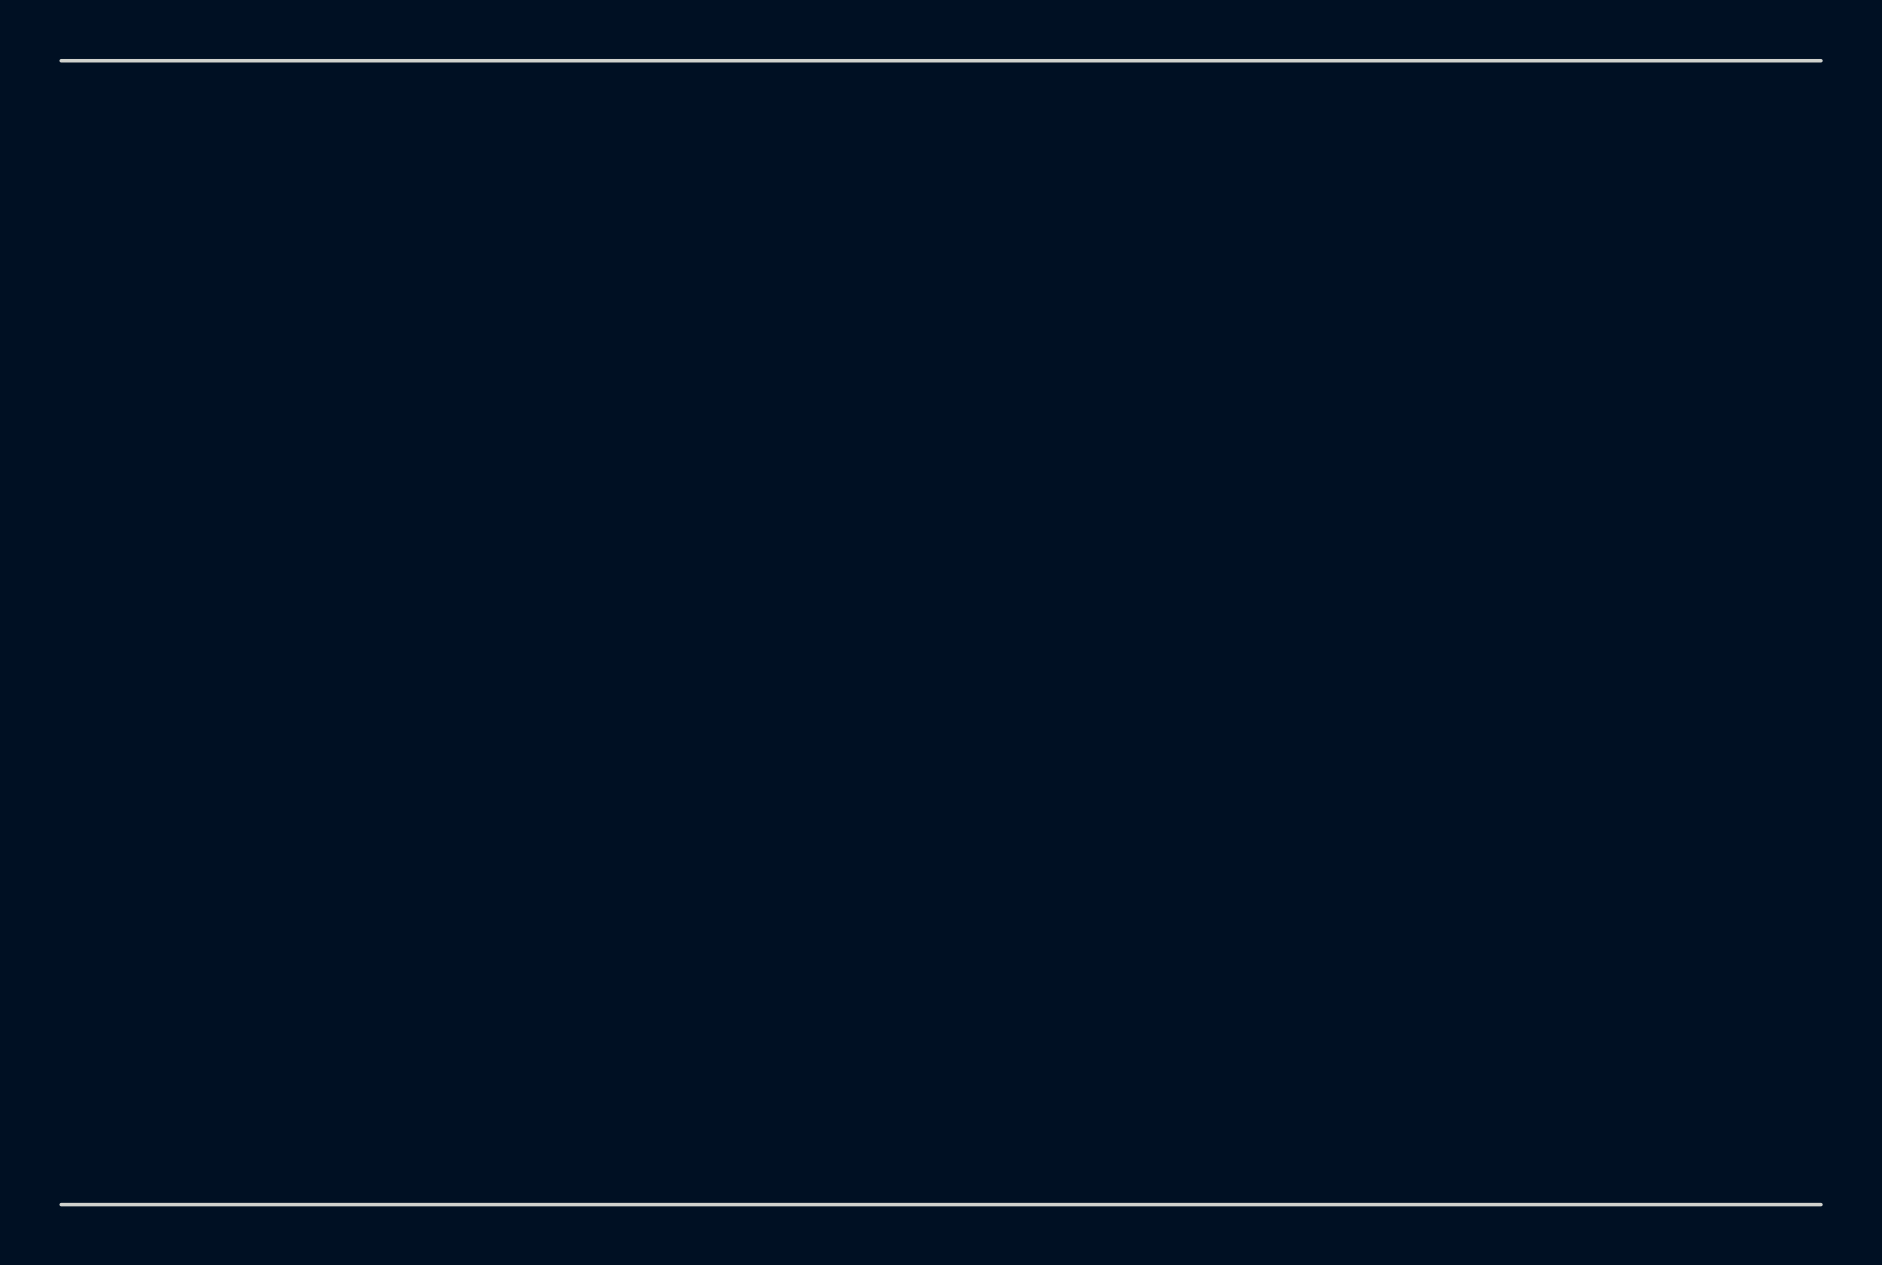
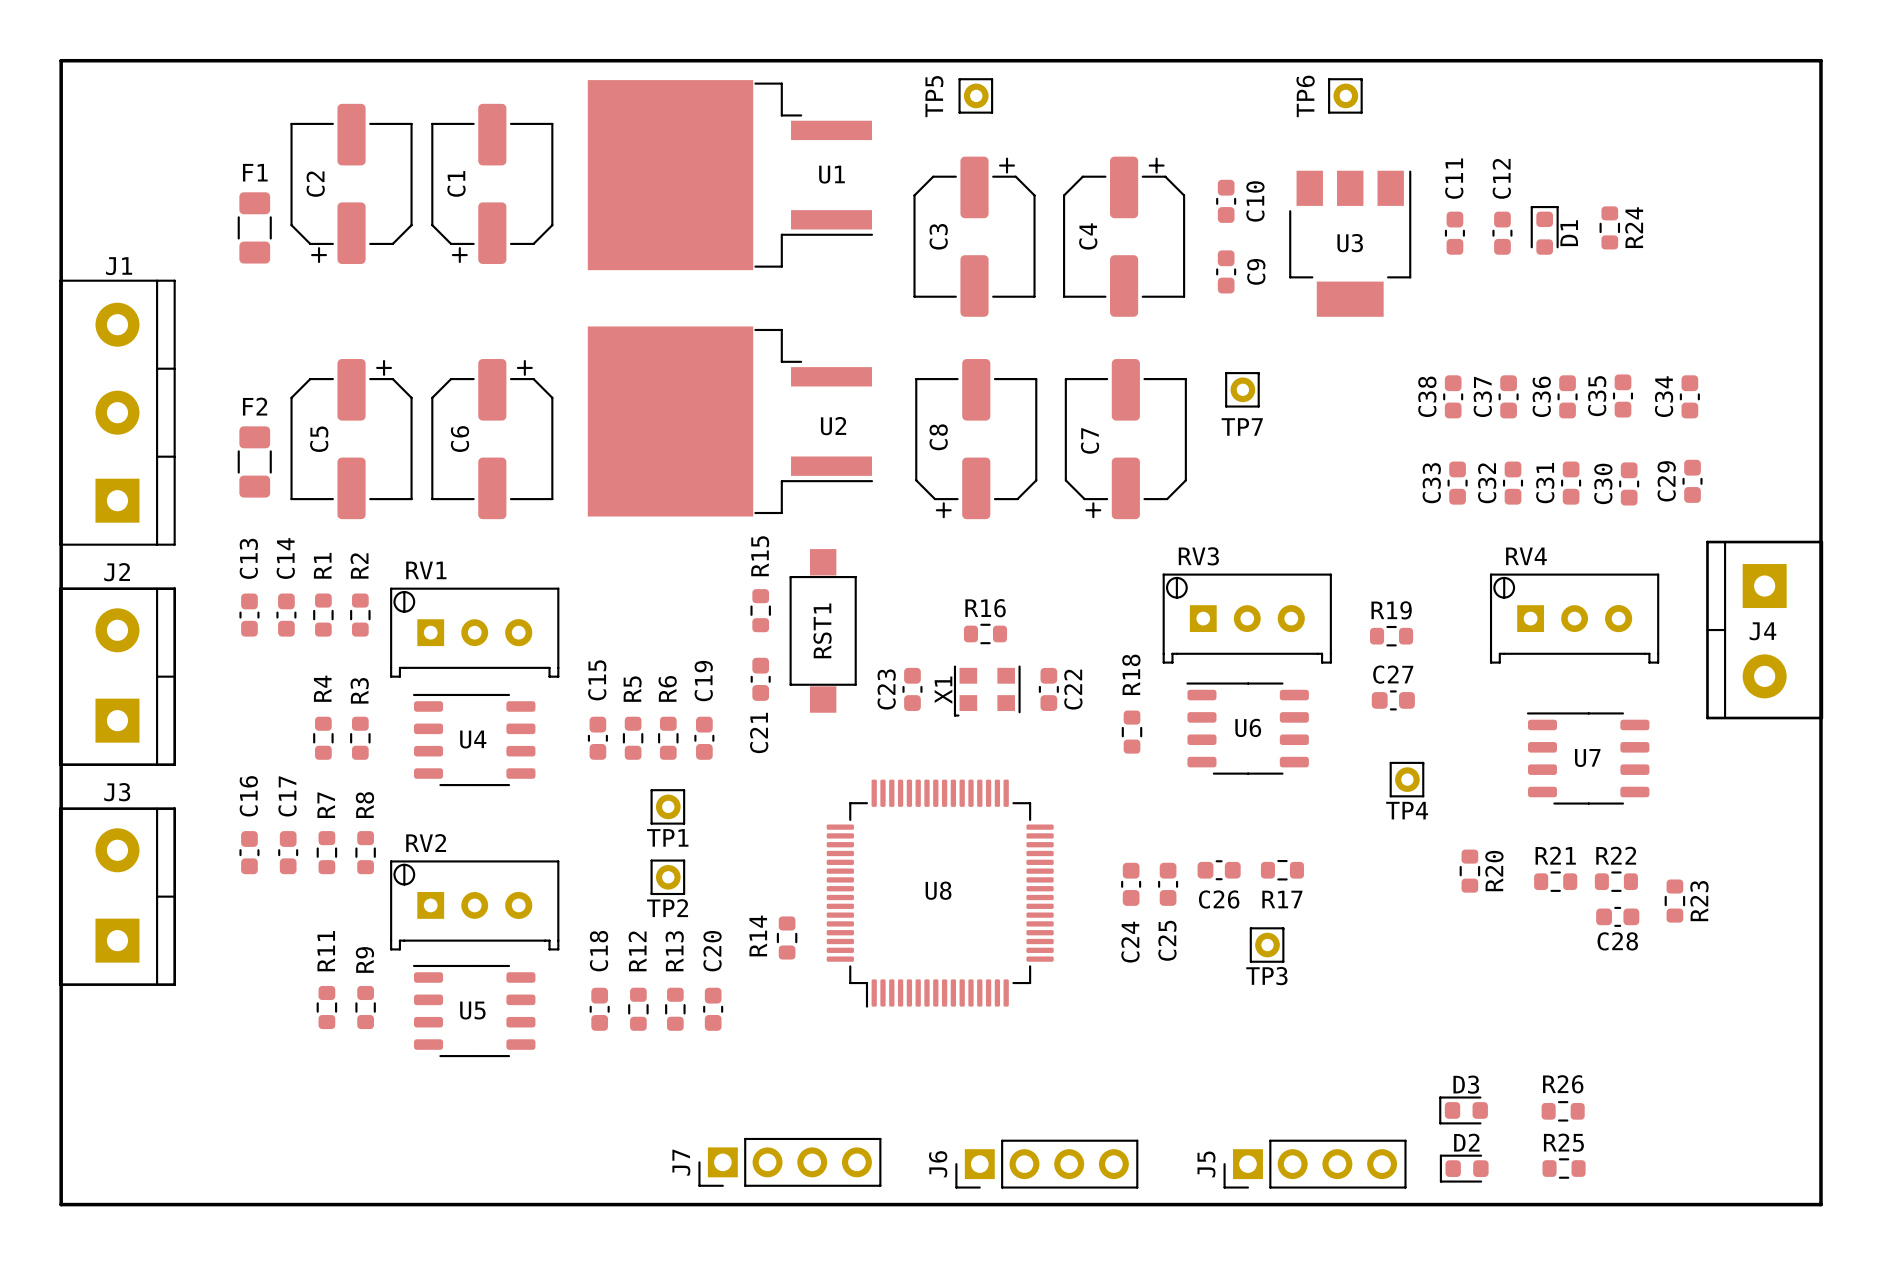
board edge: none -> (61, 60) (61, 1204)
board edge: none -> (1820, 60) (1820, 1204)
TP5: none -> (975, 95)
TP6: none -> (1345, 95)
U1: none -> (730, 175)
C2: none -> (351, 183)
C1: none -> (492, 183)
C10: none -> (1226, 201)
F1: none -> (254, 227)
R24: none -> (1609, 227)
D1: none -> (1544, 230)
C11: none -> (1454, 233)
C12: none -> (1502, 233)
C3: none -> (974, 236)
C4: none -> (1124, 236)
U3: none -> (1350, 243)
C9: none -> (1226, 271)
TP7: none -> (1242, 389)
C35: none -> (1622, 395)
C38: none -> (1453, 396)
C37: none -> (1508, 396)
C36: none -> (1567, 396)
C34: none -> (1689, 396)
J1: none -> (117, 412)
U2: none -> (730, 421)
C5: none -> (351, 439)
C6: none -> (492, 439)
C8: none -> (976, 439)
C7: none -> (1125, 439)
F2: none -> (254, 461)
C29: none -> (1692, 481)
C33: none -> (1457, 483)
C32: none -> (1513, 483)
C31: none -> (1571, 483)
C30: none -> (1629, 483)
R15: none -> (760, 610)
C13: none -> (249, 615)
C14: none -> (286, 615)
R1: none -> (323, 615)
R2: none -> (360, 615)
RV3: none -> (1247, 618)
RV4: none -> (1574, 618)
RST1: none -> (823, 630)
J4: none -> (1764, 630)
RV1: none -> (474, 632)
R16: none -> (985, 633)
R19: none -> (1391, 636)
J2: none -> (117, 676)
C21: none -> (760, 679)
C23: none -> (912, 689)
C22: none -> (1048, 689)
X1: none -> (987, 691)
C27: none -> (1393, 700)
U6: none -> (1247, 728)
R18: none -> (1132, 732)
R4: none -> (323, 738)
R3: none -> (360, 738)
C15: none -> (597, 738)
R5: none -> (633, 738)
R6: none -> (668, 738)
C19: none -> (704, 738)
U4: none -> (474, 740)
U7: none -> (1588, 758)
TP4: none -> (1406, 779)
TP1: none -> (667, 806)
C16: none -> (249, 852)
C17: none -> (288, 852)
R7: none -> (326, 852)
R8: none -> (365, 852)
C26: none -> (1219, 870)
R17: none -> (1282, 870)
R20: none -> (1469, 871)
TP2: none -> (667, 877)
R21: none -> (1555, 881)
R22: none -> (1616, 881)
C24: none -> (1131, 884)
C25: none -> (1168, 884)
U8: none -> (940, 893)
J3: none -> (117, 896)
R23: none -> (1674, 901)
RV2: none -> (474, 905)
C28: none -> (1617, 916)
R14: none -> (787, 937)
TP3: none -> (1267, 945)
R11: none -> (326, 1007)
R9: none -> (365, 1007)
C18: none -> (599, 1009)
R12: none -> (638, 1009)
R13: none -> (675, 1009)
C20: none -> (713, 1009)
U5: none -> (474, 1011)
D3: none -> (1463, 1110)
R26: none -> (1563, 1111)
J7: none -> (789, 1162)
J6: none -> (1046, 1164)
J5: none -> (1315, 1164)
D2: none -> (1464, 1168)
R25: none -> (1564, 1168)

